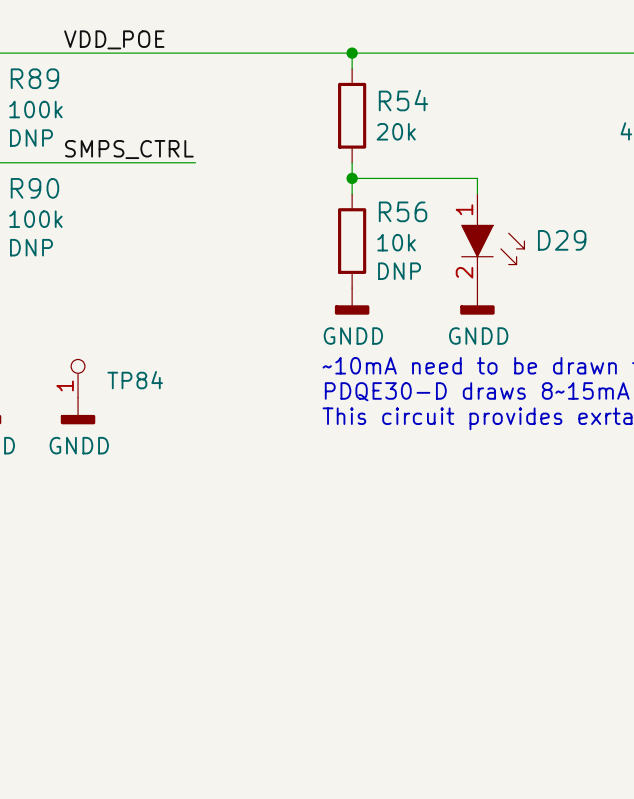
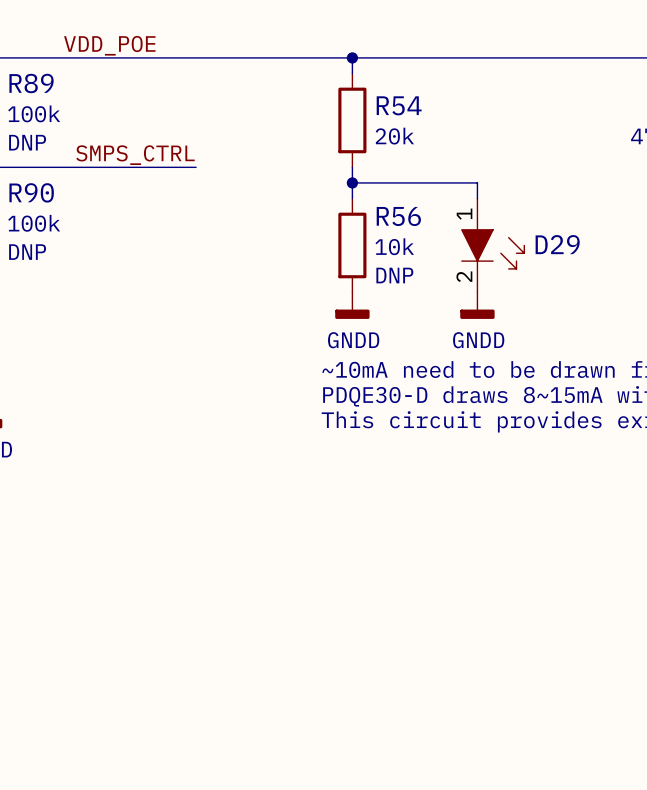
TP84: (78, 378) -> none
power symbol: GNDD (78, 411) -> none

